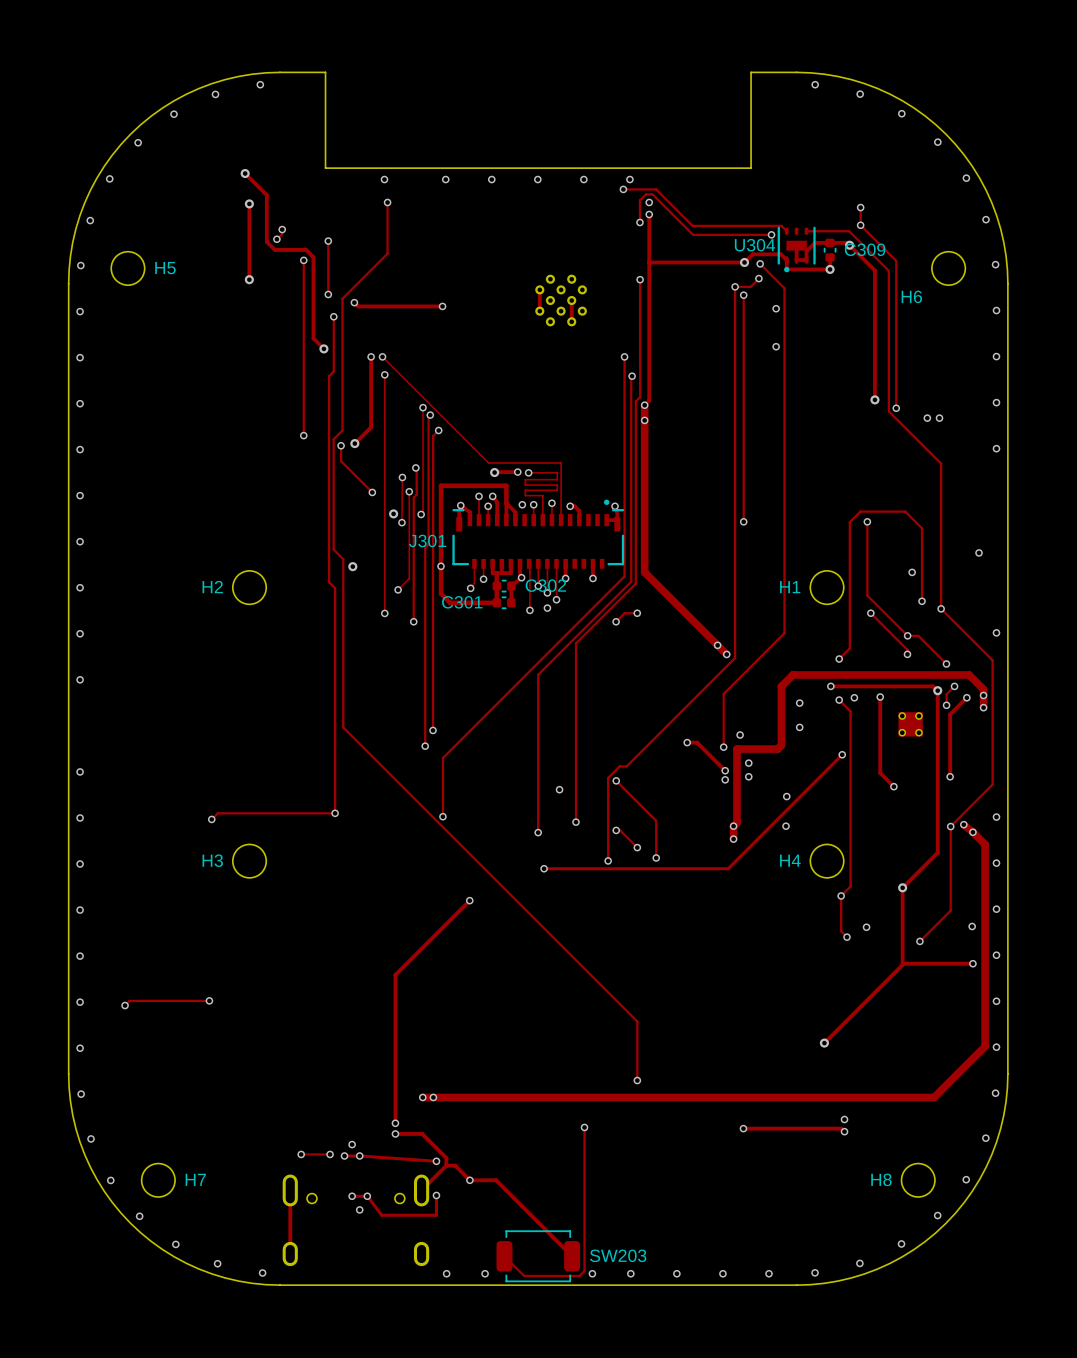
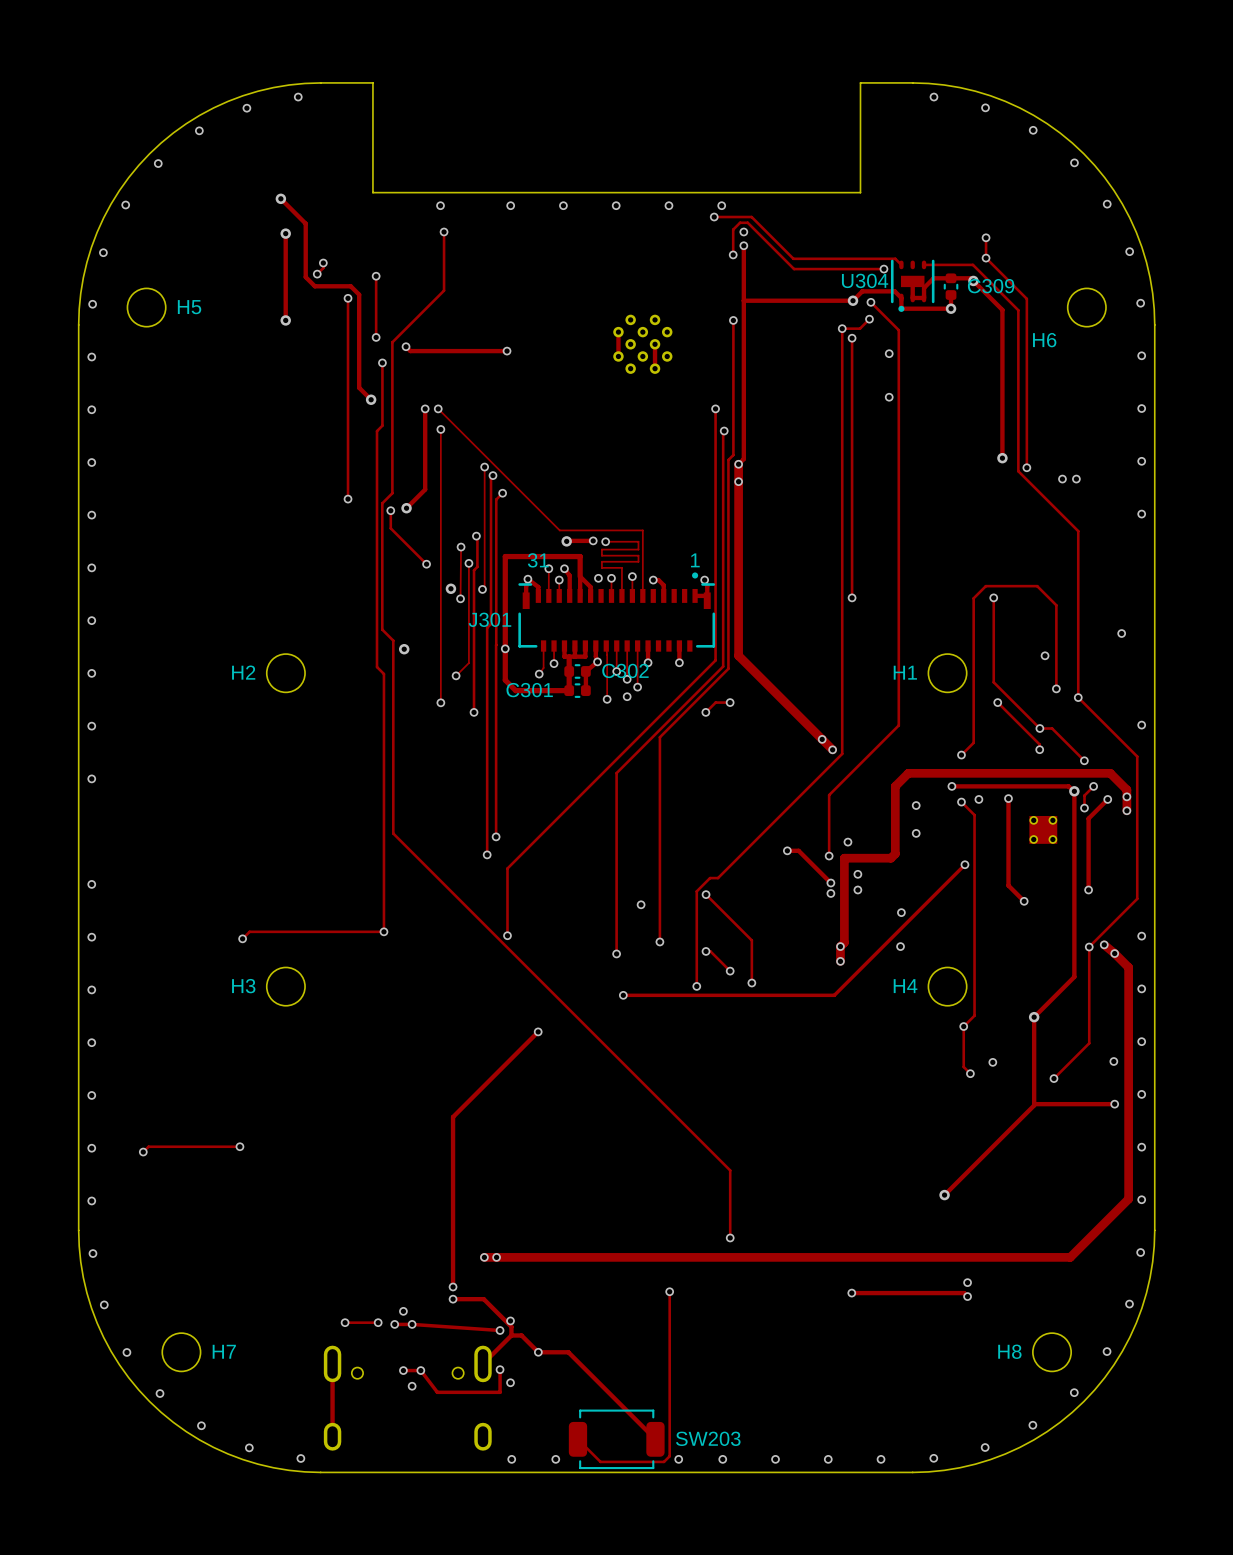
text: none -> 31 (538, 560)
text: none -> 1 (695, 560)
via: none -> (510, 1320)
via: none -> (510, 1382)

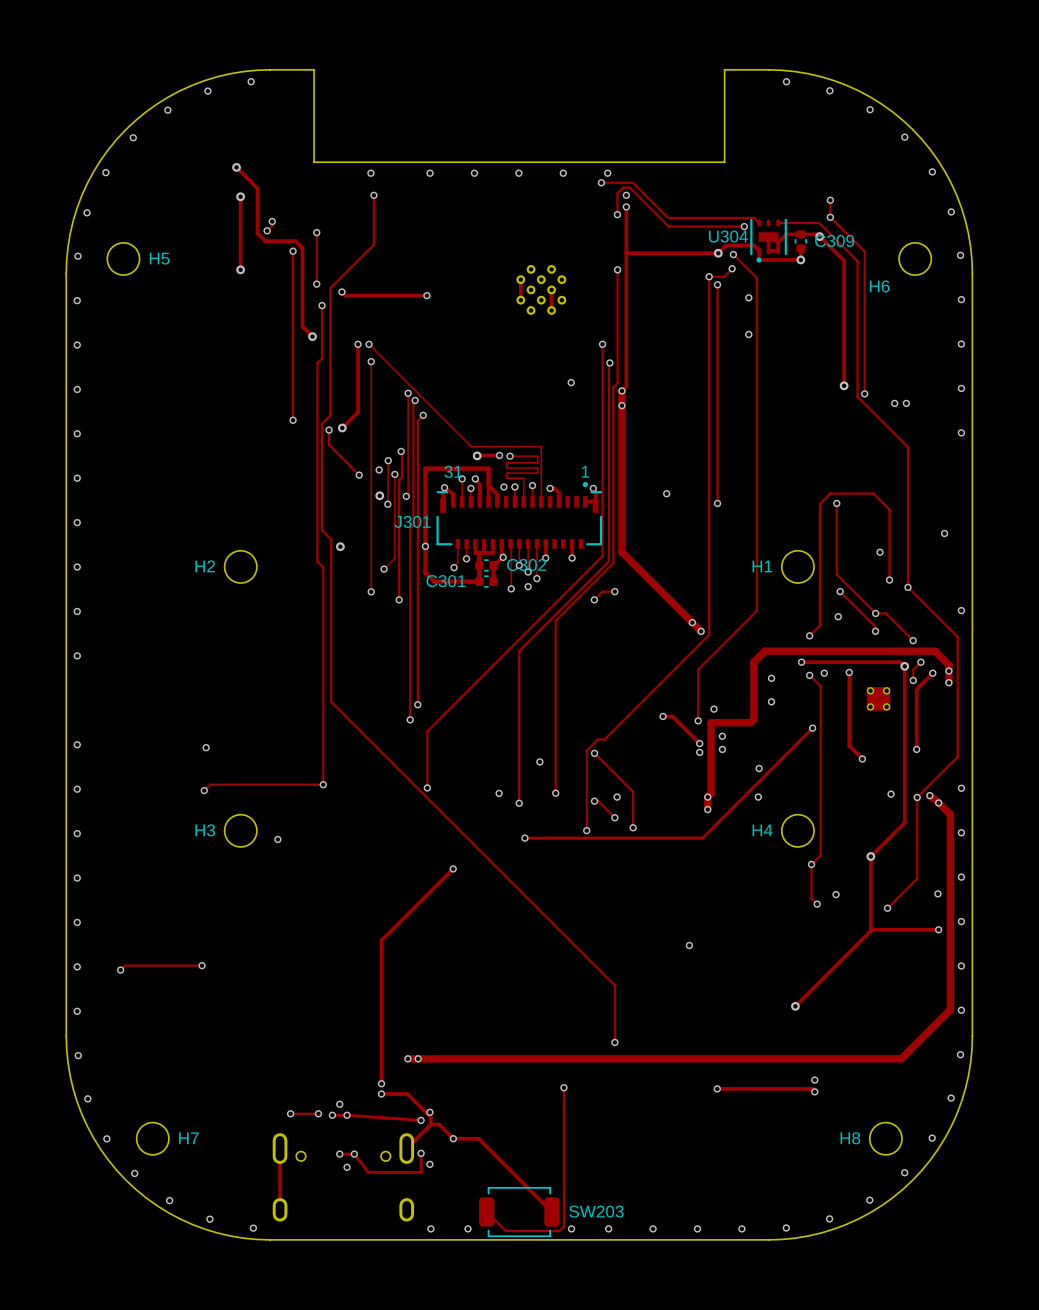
via: none -> (571, 382)
via: none -> (379, 469)
via: none -> (666, 493)
via: none -> (838, 616)
via: none -> (206, 747)
via: none -> (499, 793)
via: none -> (891, 794)
via: none -> (617, 797)
via: none -> (277, 839)
via: none -> (689, 945)

